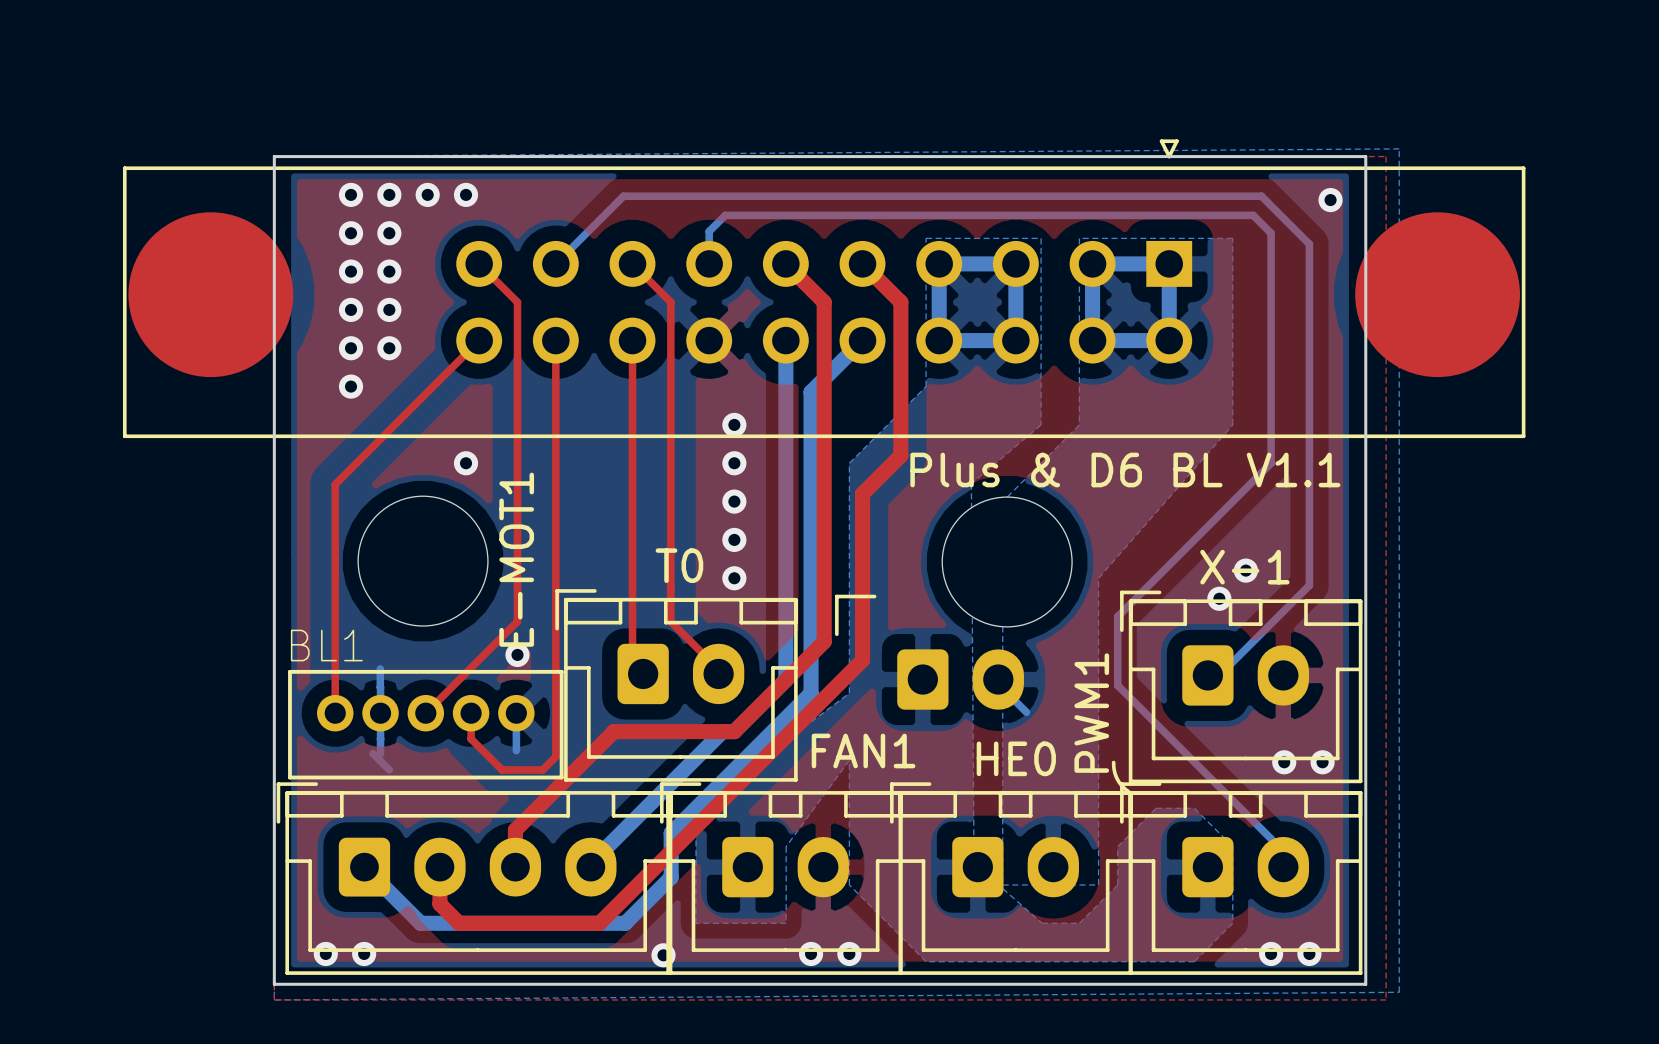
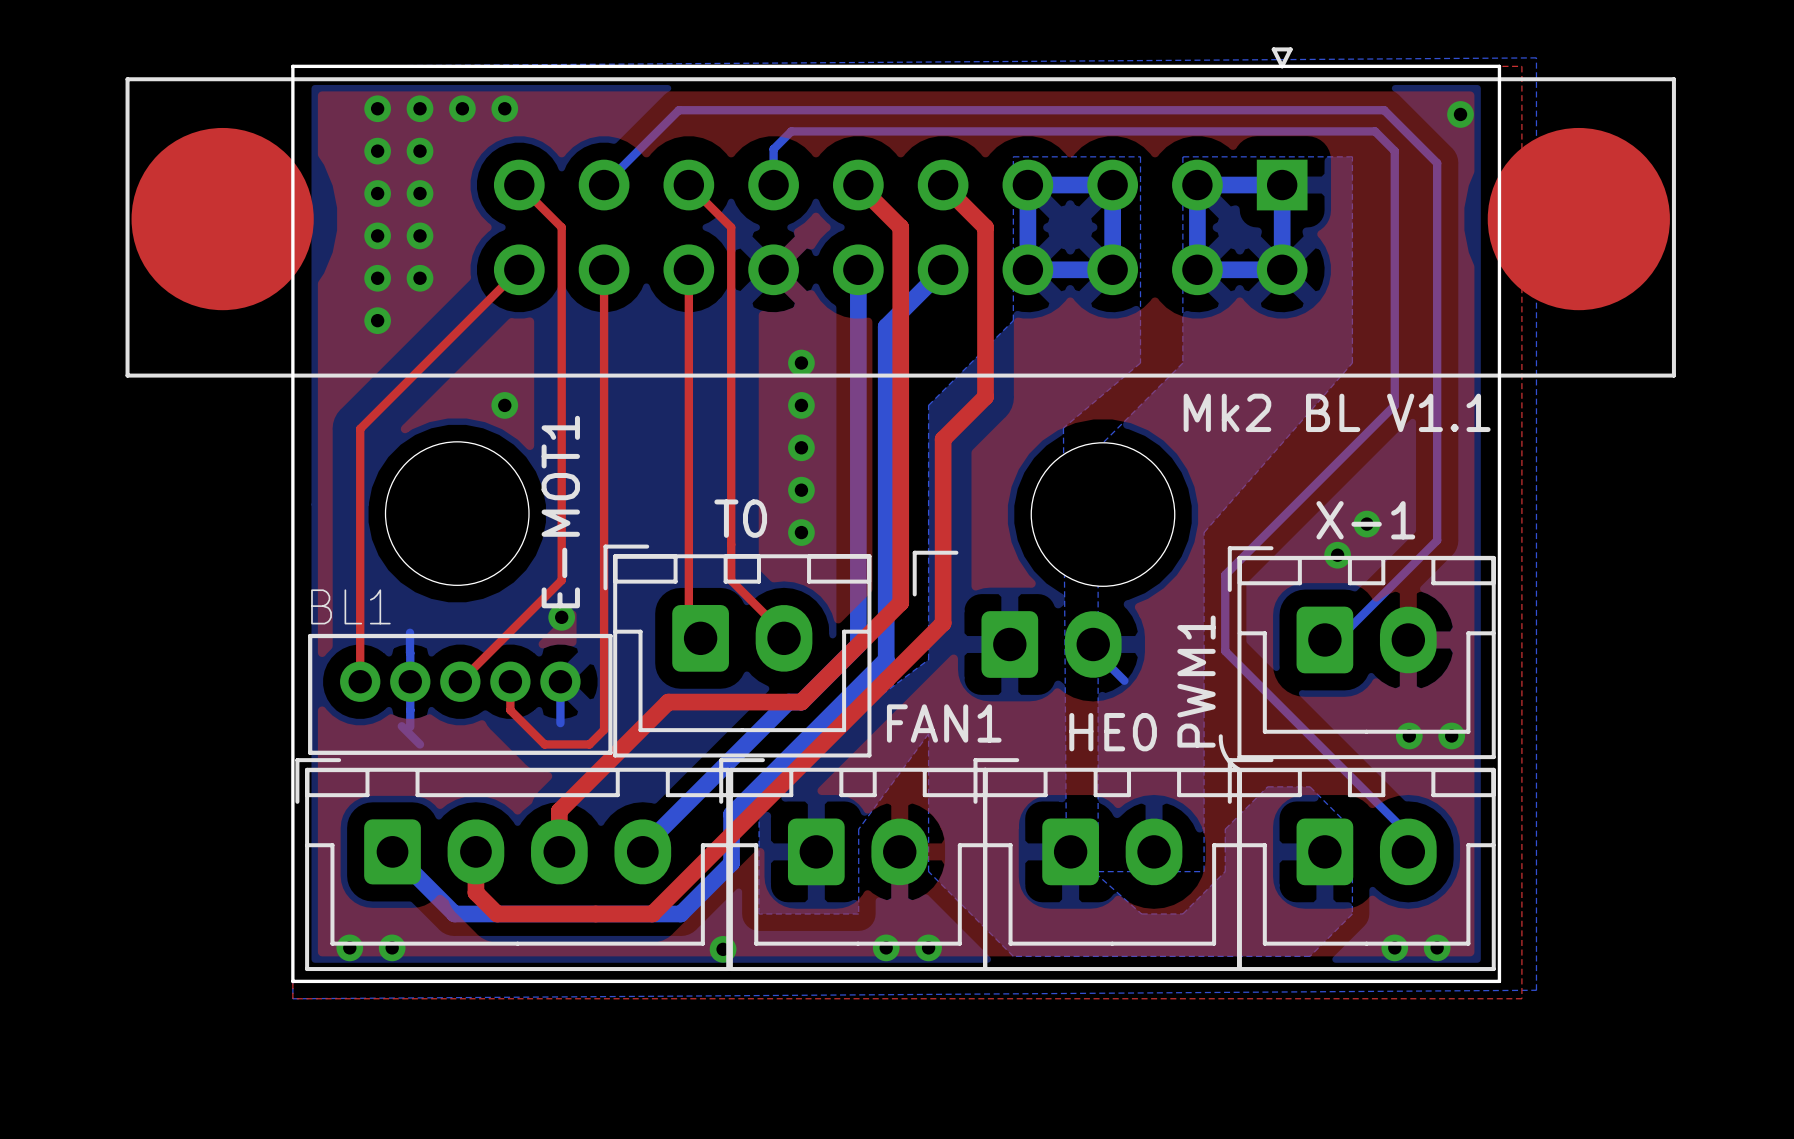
text: Plus & D6 BL V1.1 (1125, 469) -> none
text: none -> Mk2 BL V1.1 (1337, 412)

